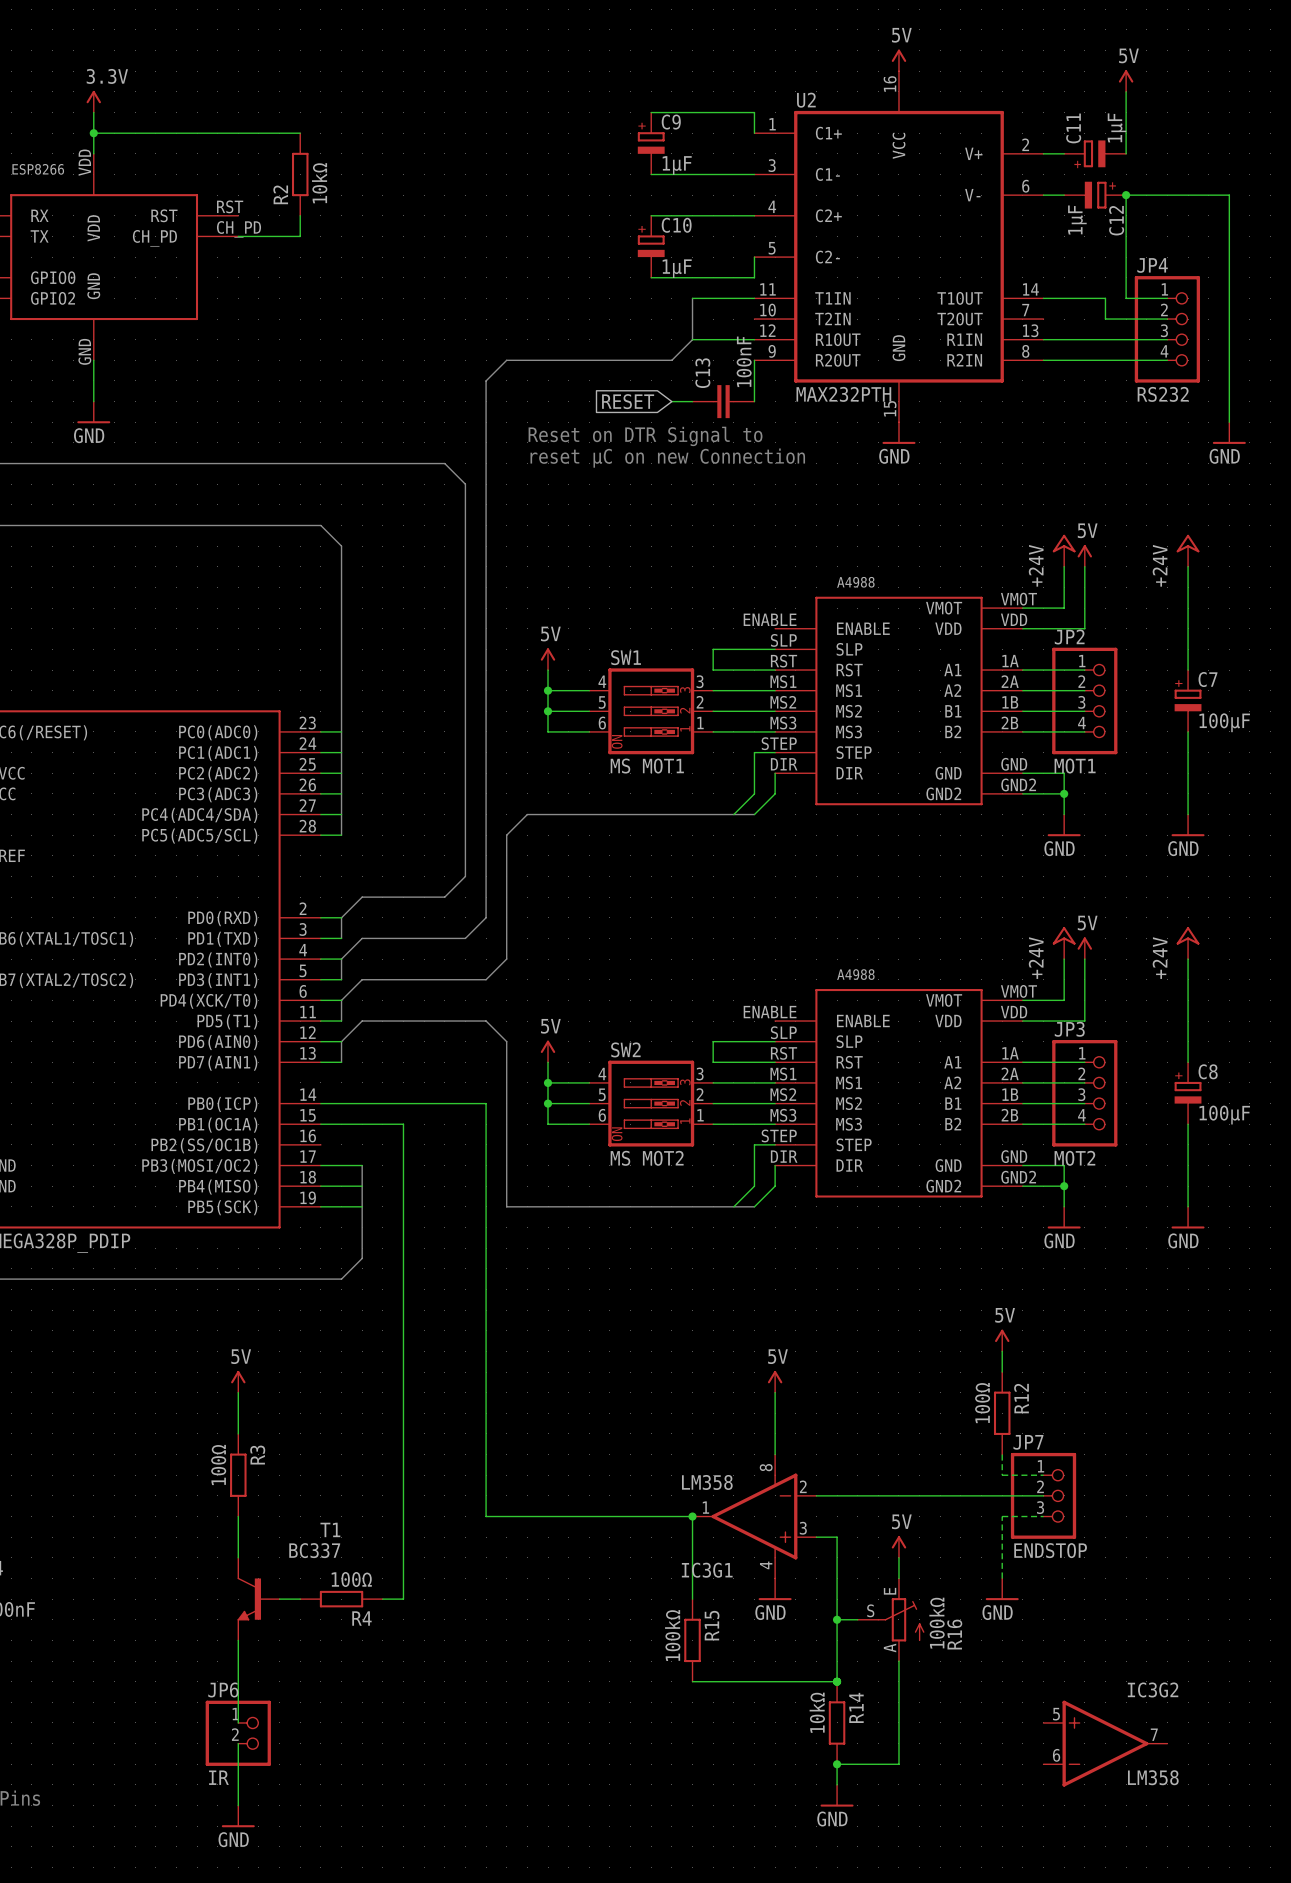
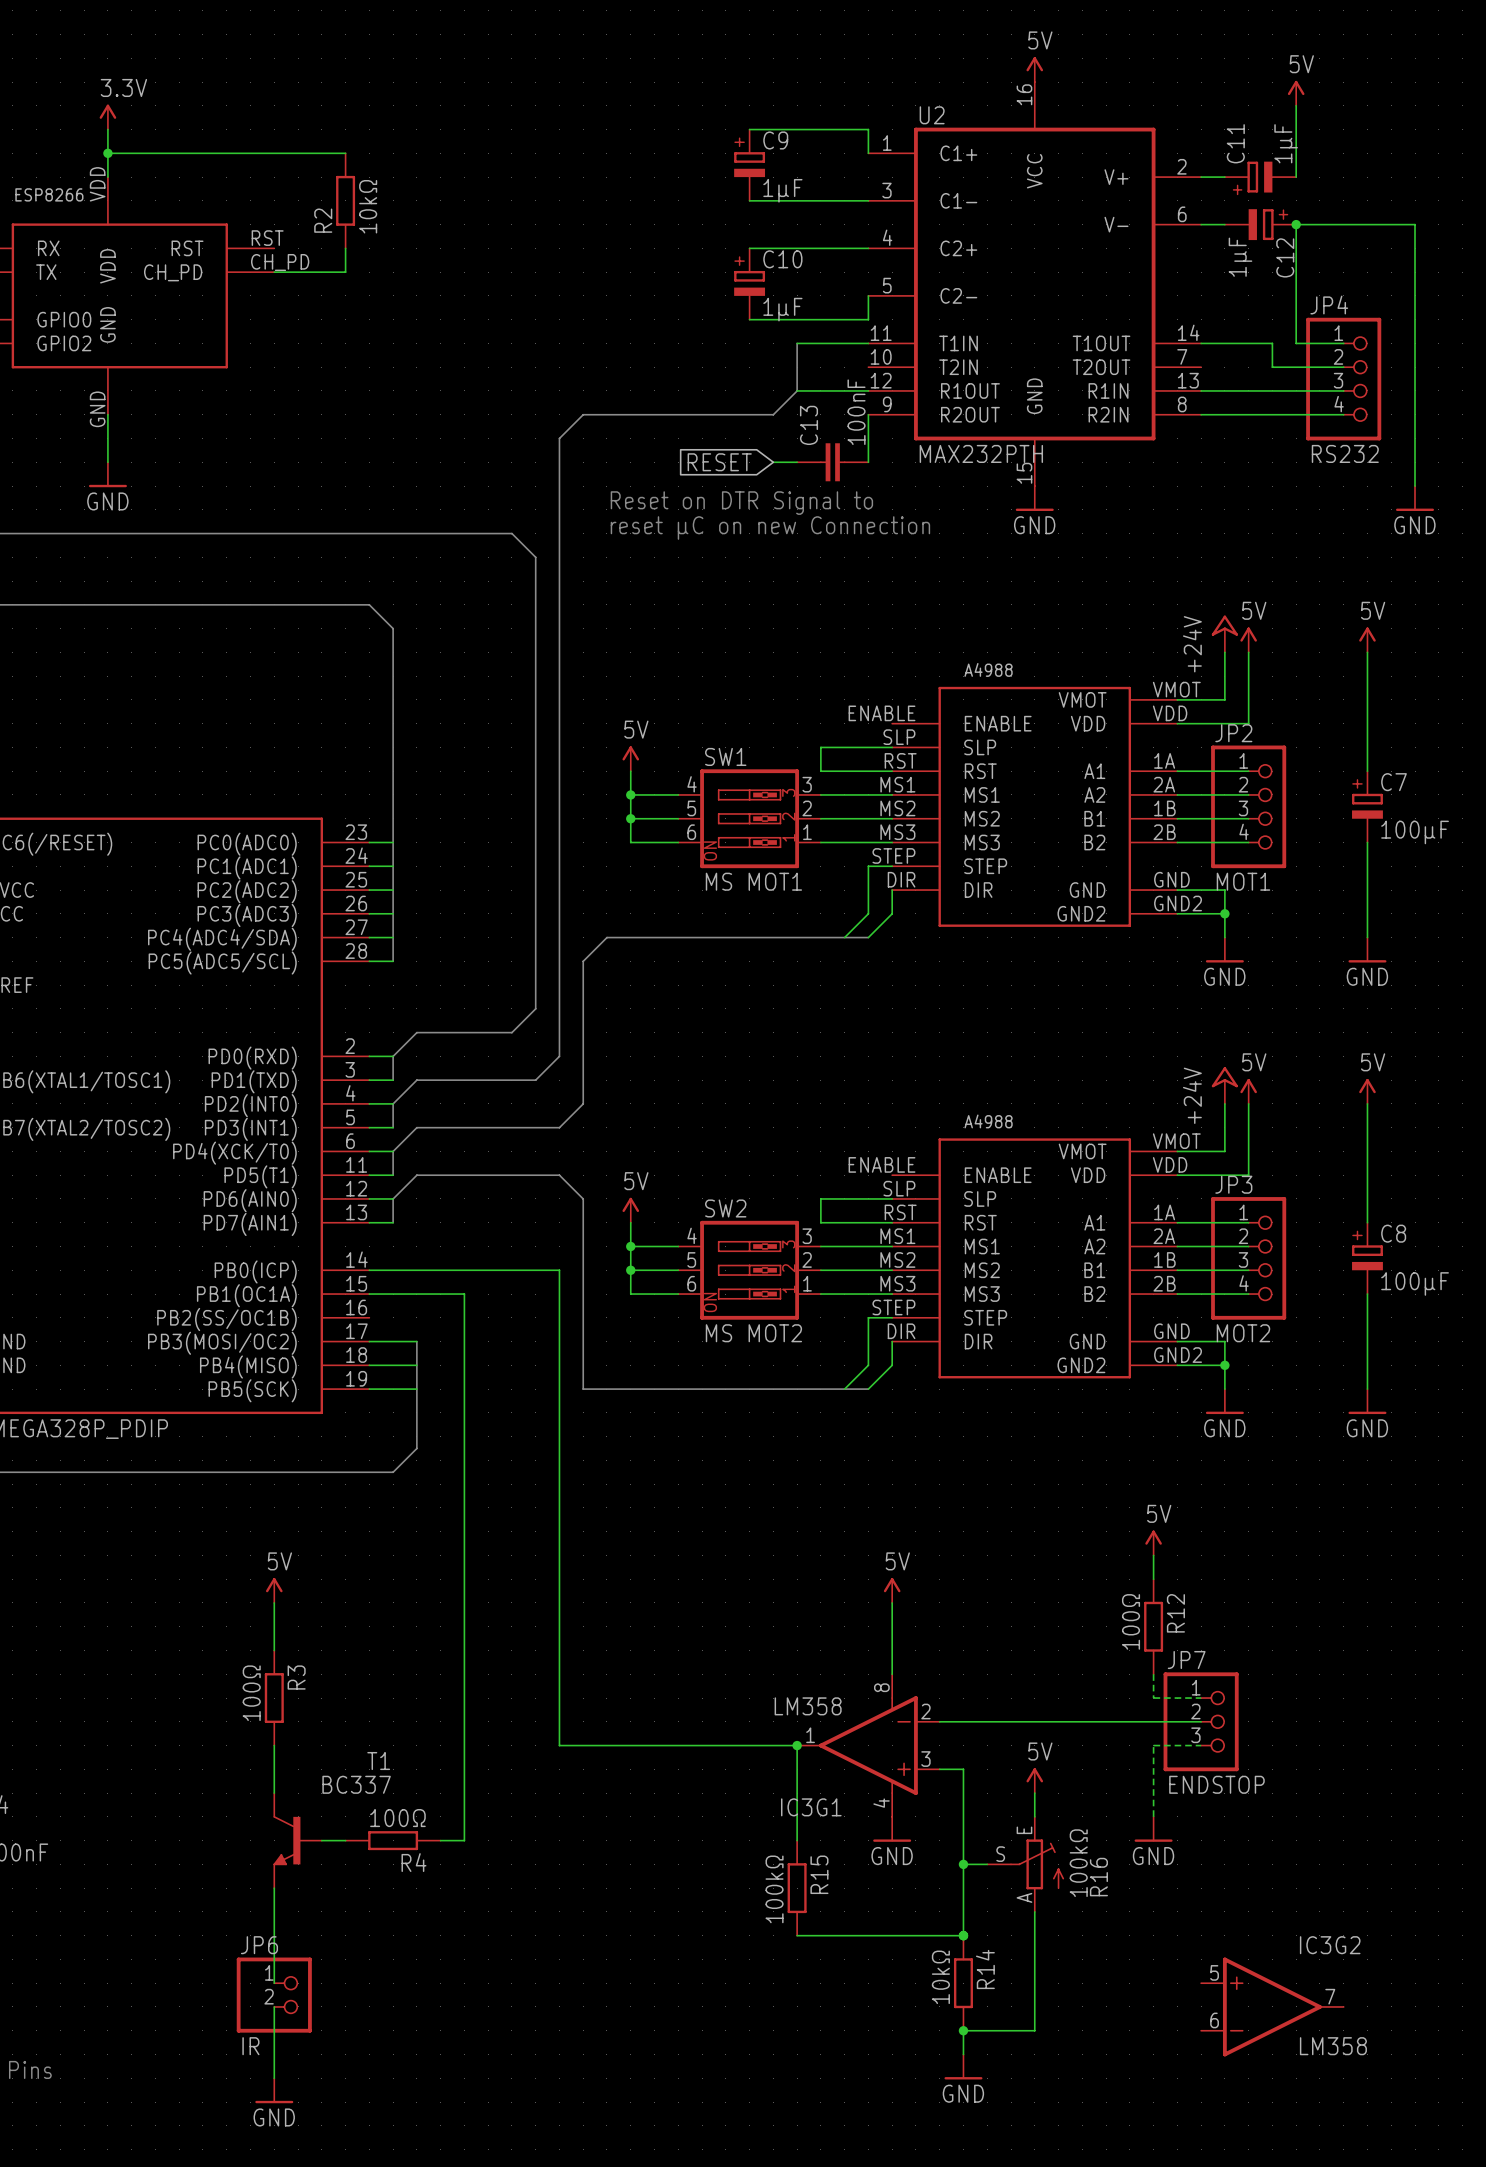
power symbol: +24V (1188, 550) -> 5V (1367, 639)
power symbol: +24V (1188, 943) -> 5V (1367, 1091)

